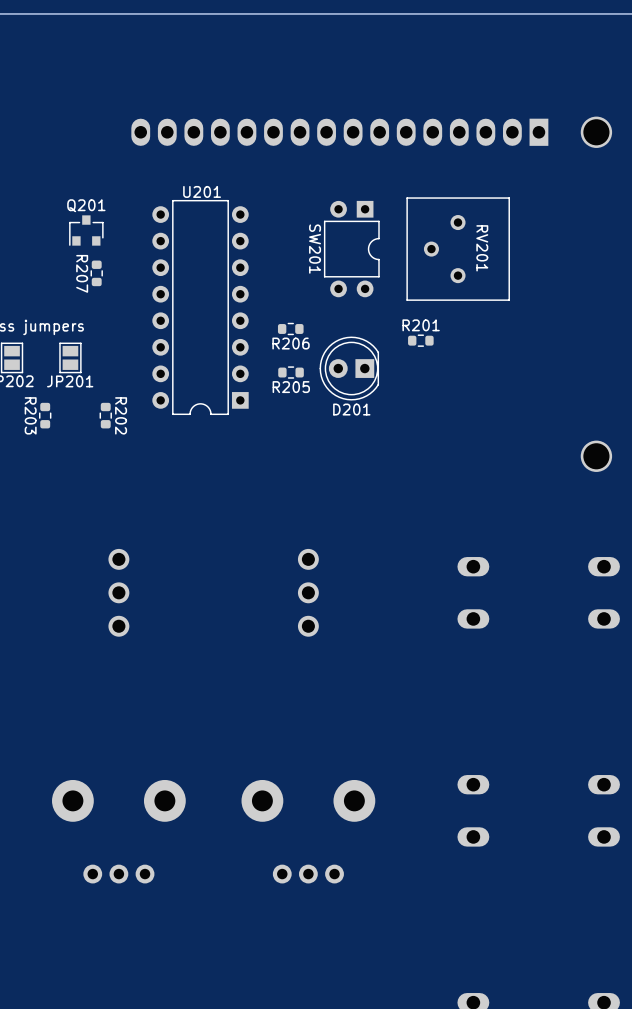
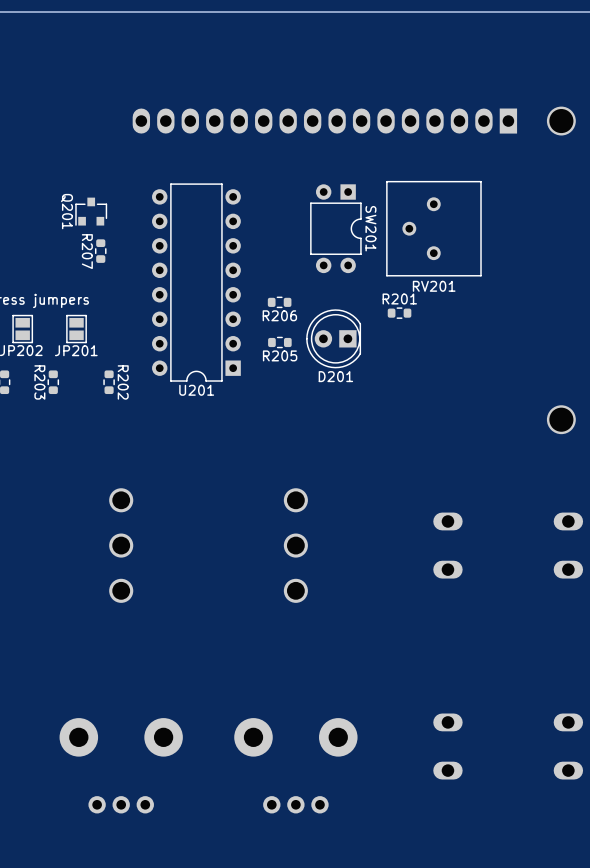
U201 name position: U201 (202, 191) -> U201 (196, 390)
Q201 name rotation: 0° (86, 205) -> 90° clockwise (67, 211)
RV201 name rotation: 0° (482, 248) -> 90° counterclockwise (434, 286)
RV201 name position: RV201 (482, 248) -> RV201 (434, 286)
SW201 name position: SW201 (315, 249) -> SW201 (370, 228)
part footprint: [108, 548, 130, 637] -> [109, 488, 134, 603]
part footprint: [297, 548, 319, 637] -> [283, 488, 308, 603]

